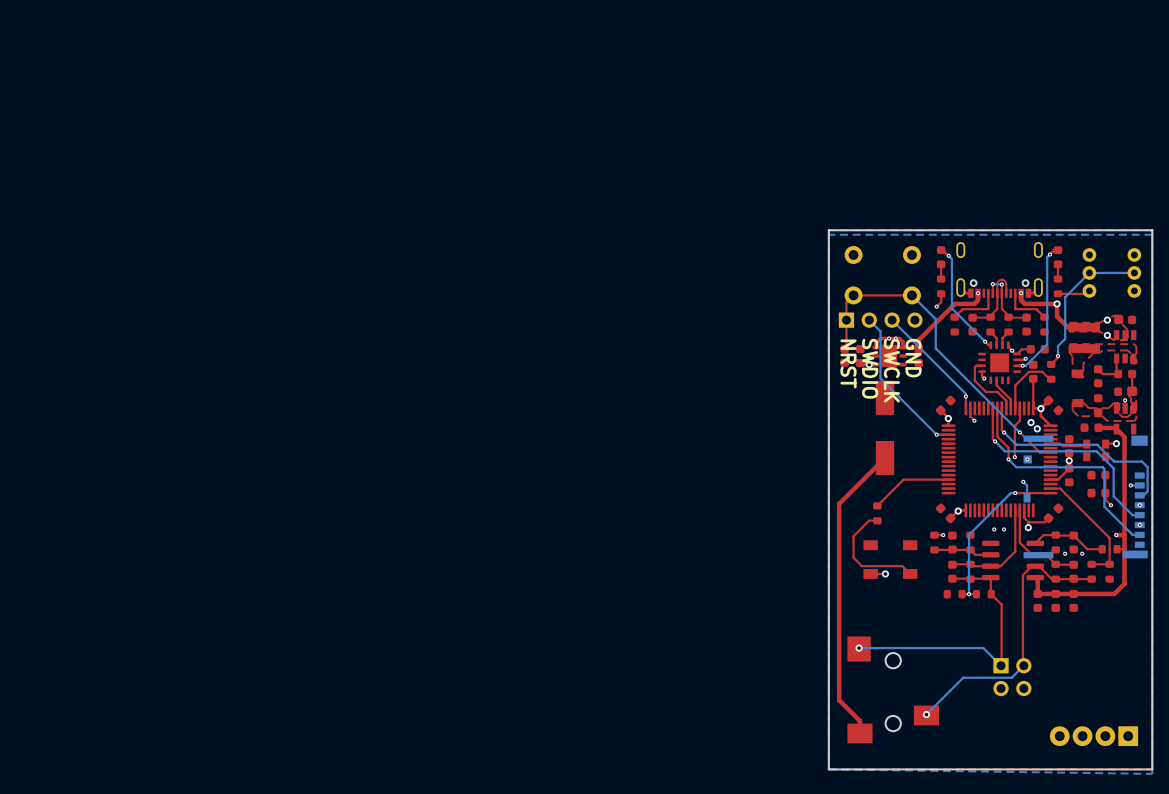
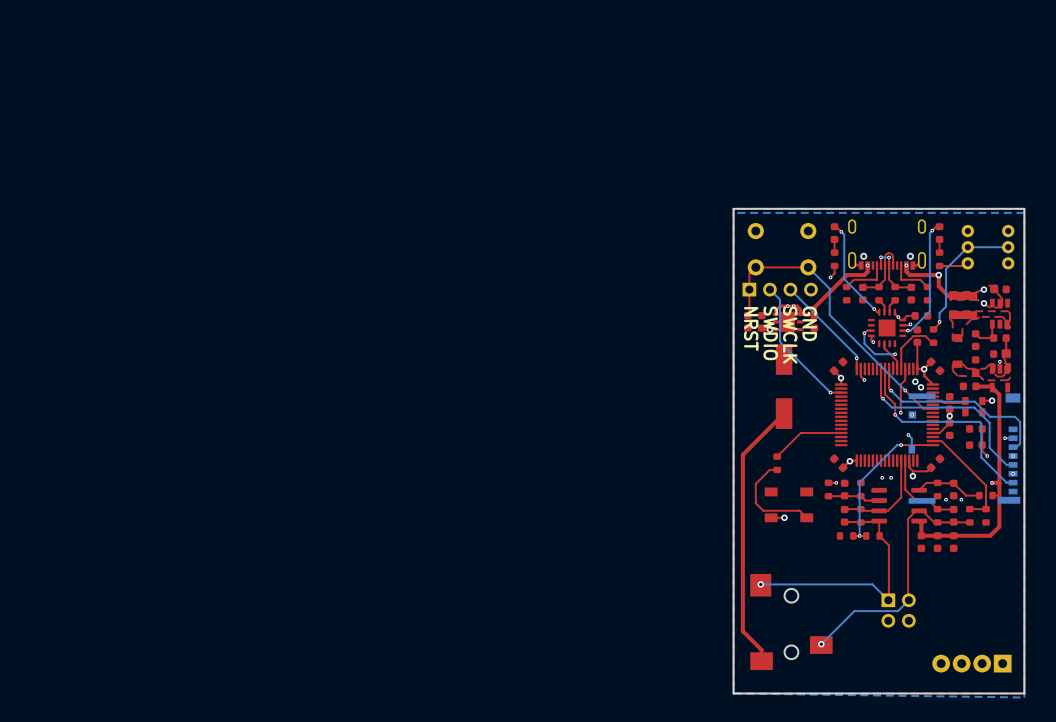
top track: (977, 365) (974, 367) (974, 380) (986, 392) (997, 392) (1006, 400) -> (867, 330) (864, 333)
bottom track: none -> (864, 333) (864, 343) (874, 354) (895, 354)
via: none -> (864, 333)
via: none -> (895, 354)

